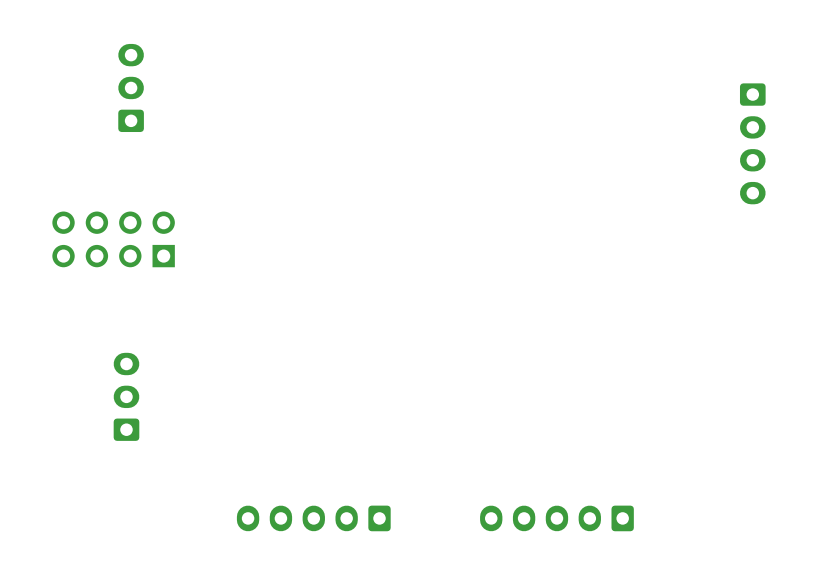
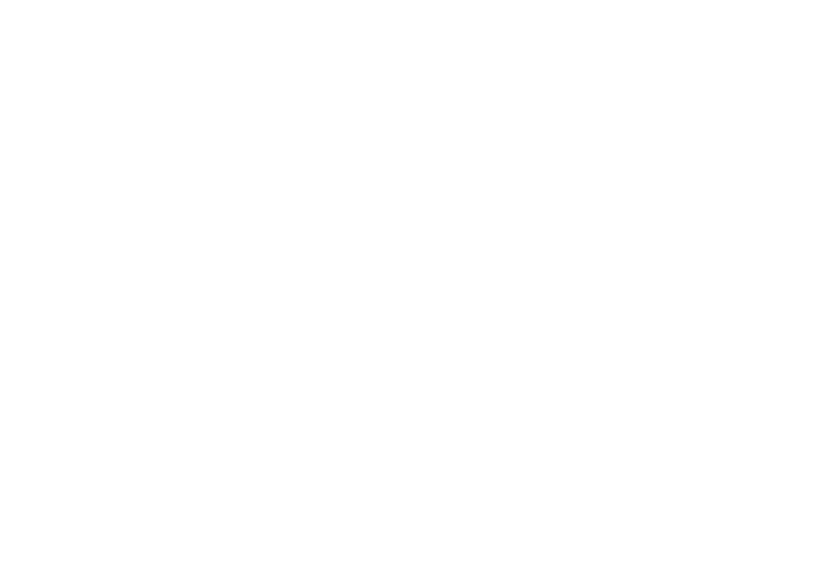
part: (131, 87) -> none
part: (752, 143) -> none
part: (113, 239) -> none
part: (126, 396) -> none
part: (313, 518) -> none
part: (556, 518) -> none

